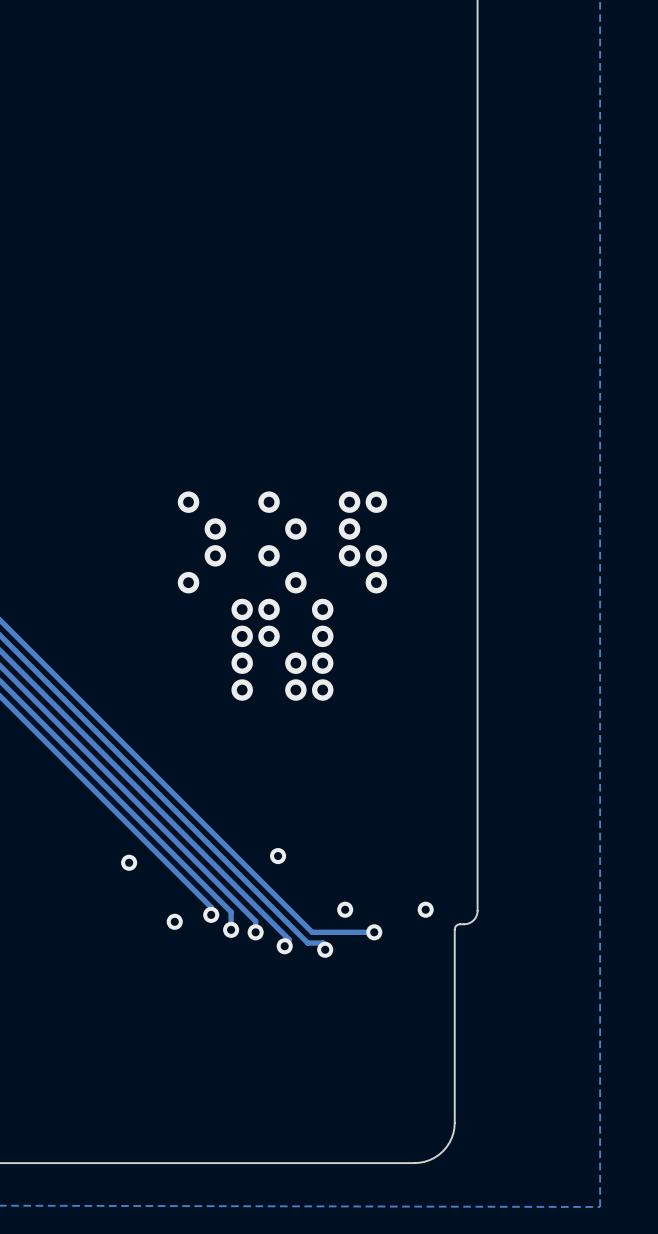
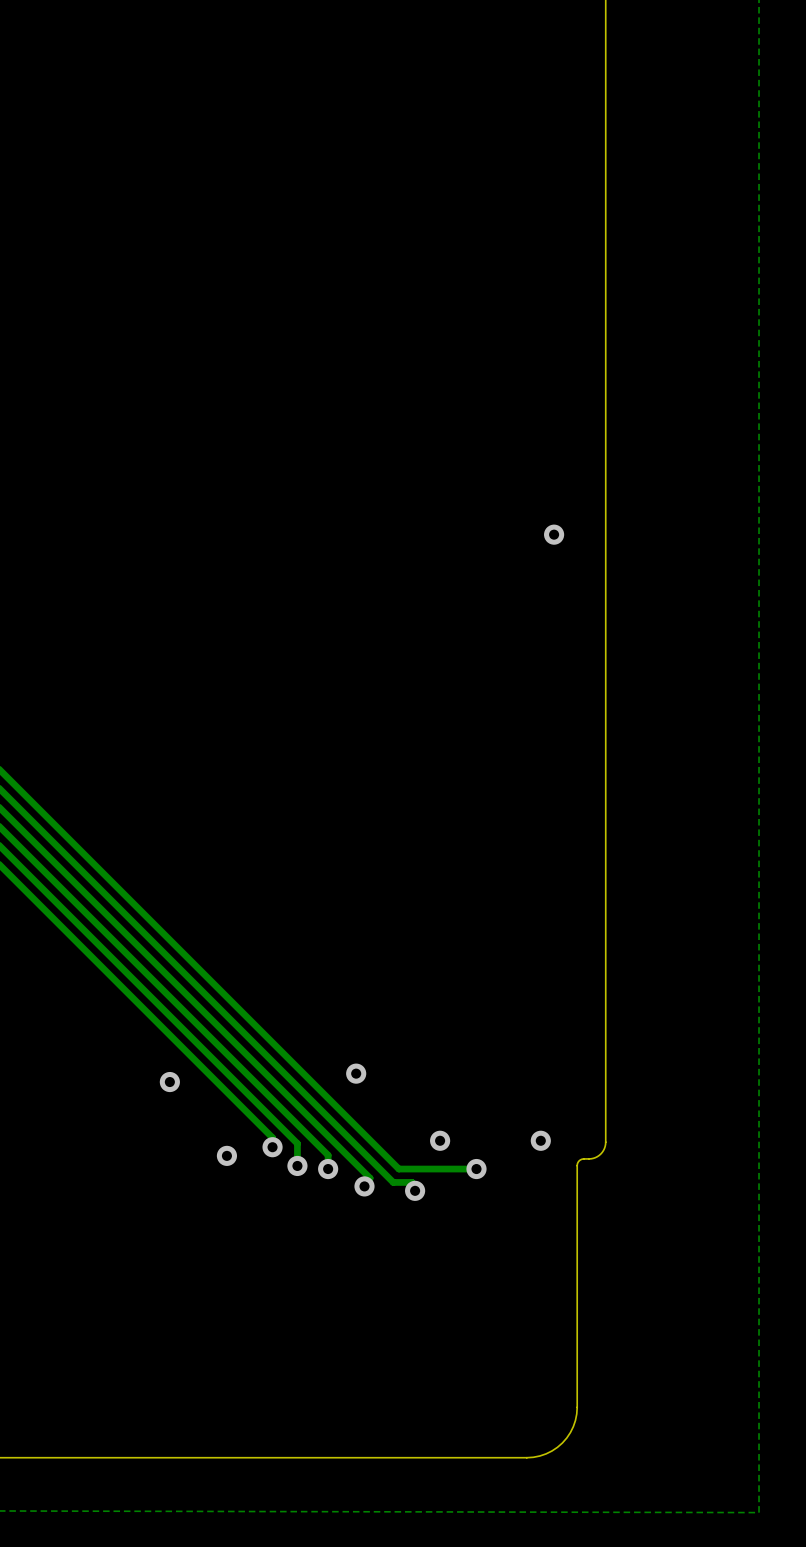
via: none -> (554, 534)
via: (188, 502) -> none
via: (269, 502) -> none
via: (349, 502) -> none
via: (376, 502) -> none
via: (215, 529) -> none
via: (295, 529) -> none
via: (349, 529) -> none
via: (215, 555) -> none
via: (269, 555) -> none
via: (349, 555) -> none
via: (376, 555) -> none
via: (188, 582) -> none
via: (295, 582) -> none
via: (376, 582) -> none
via: (242, 609) -> none
via: (269, 609) -> none
via: (322, 609) -> none
via: (242, 636) -> none
via: (269, 636) -> none
via: (322, 636) -> none
via: (242, 663) -> none
via: (295, 663) -> none
via: (322, 663) -> none
via: (242, 690) -> none
via: (295, 690) -> none
via: (322, 690) -> none

